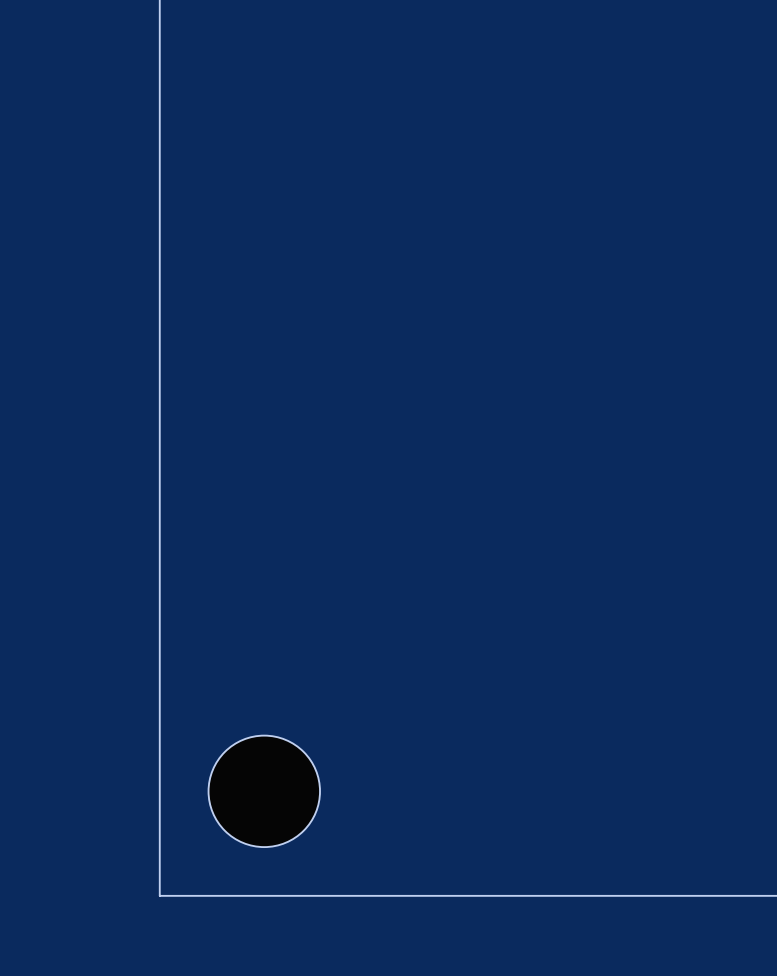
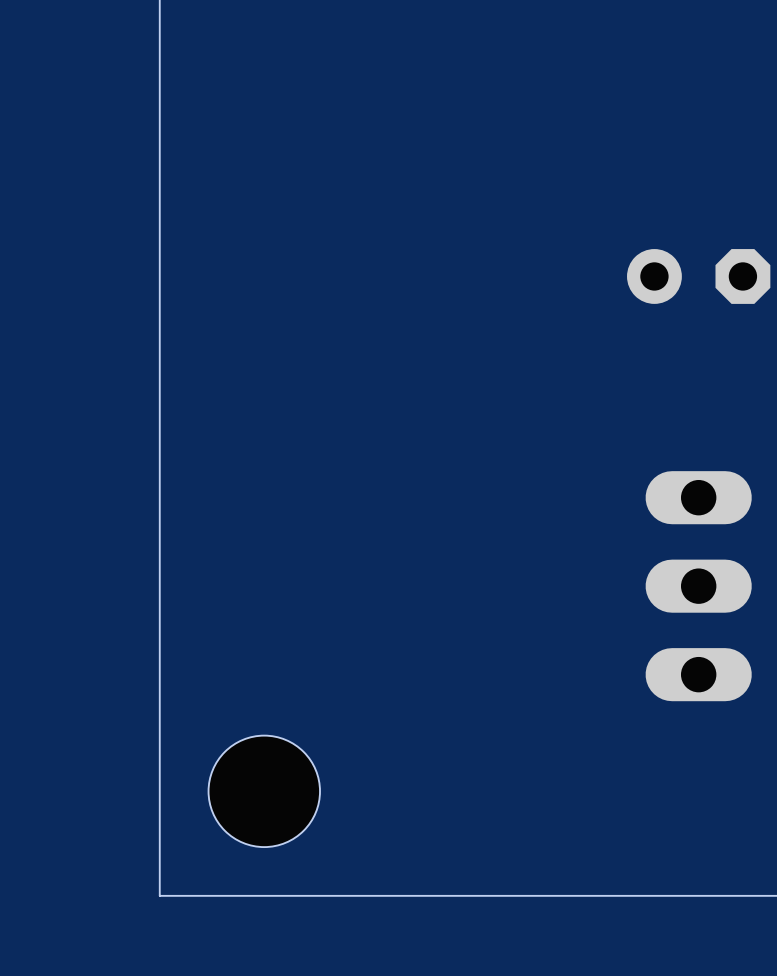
part: none -> (698, 276)
part: none -> (698, 586)

